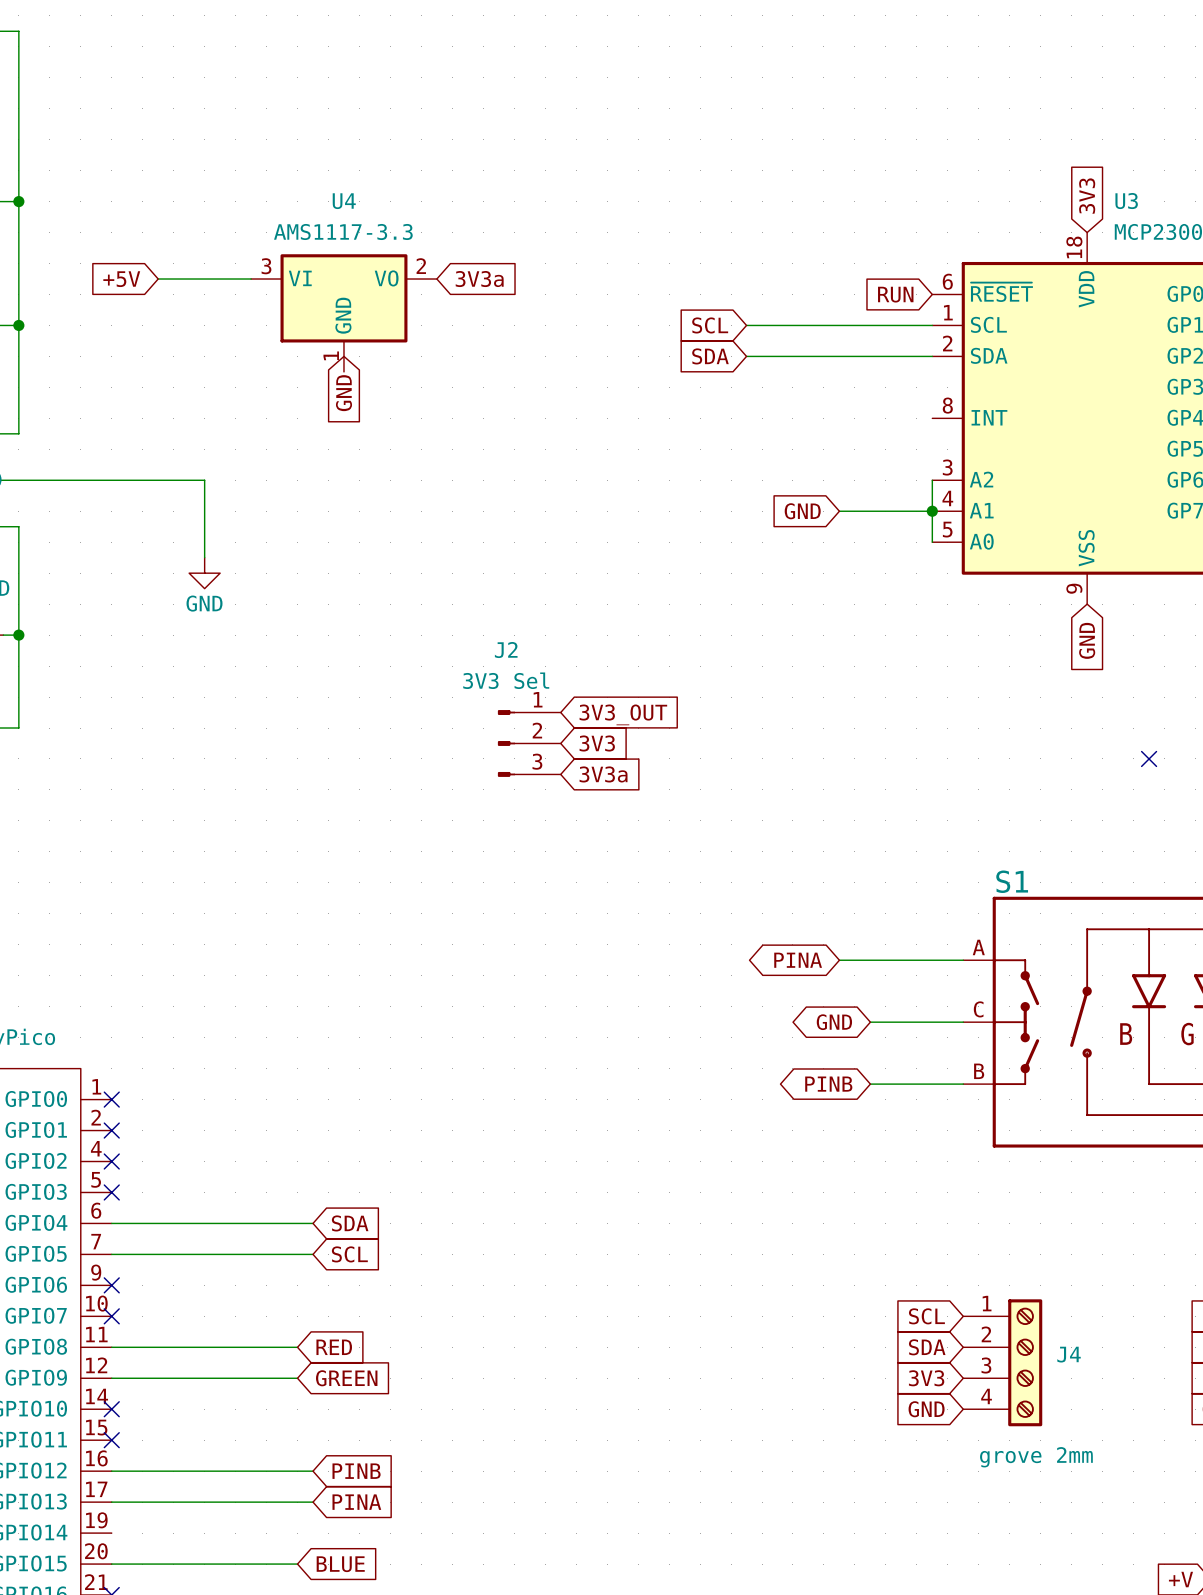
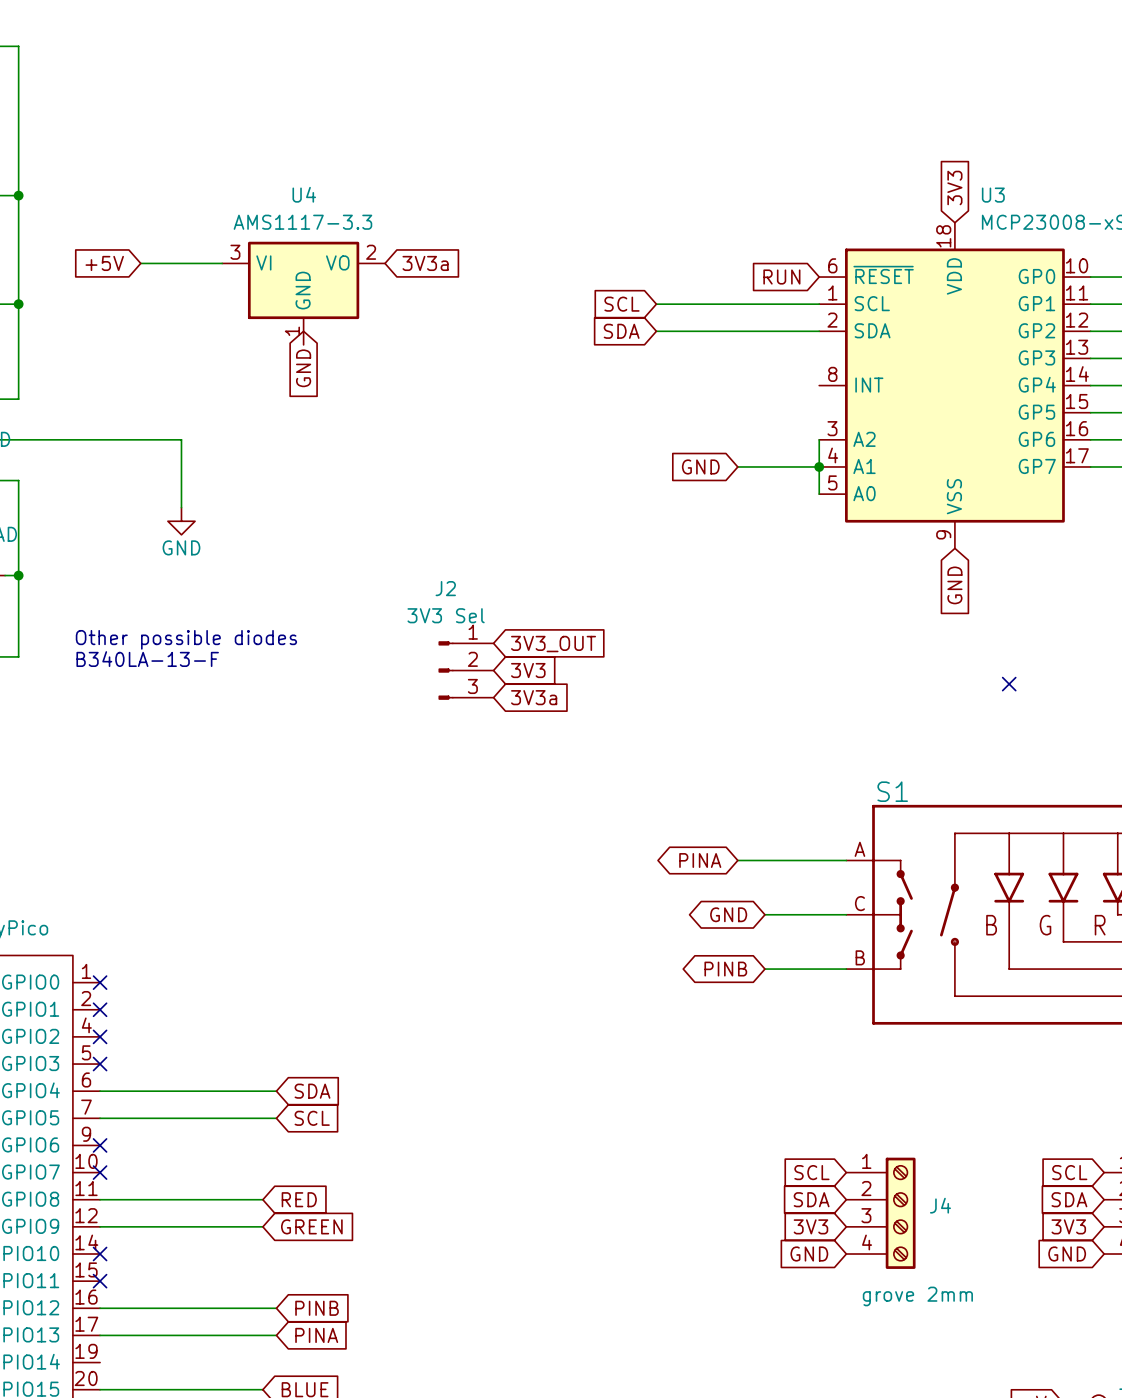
text: none -> Other possible diodes (186, 639)
text: none -> B340LA-13-F (147, 659)

